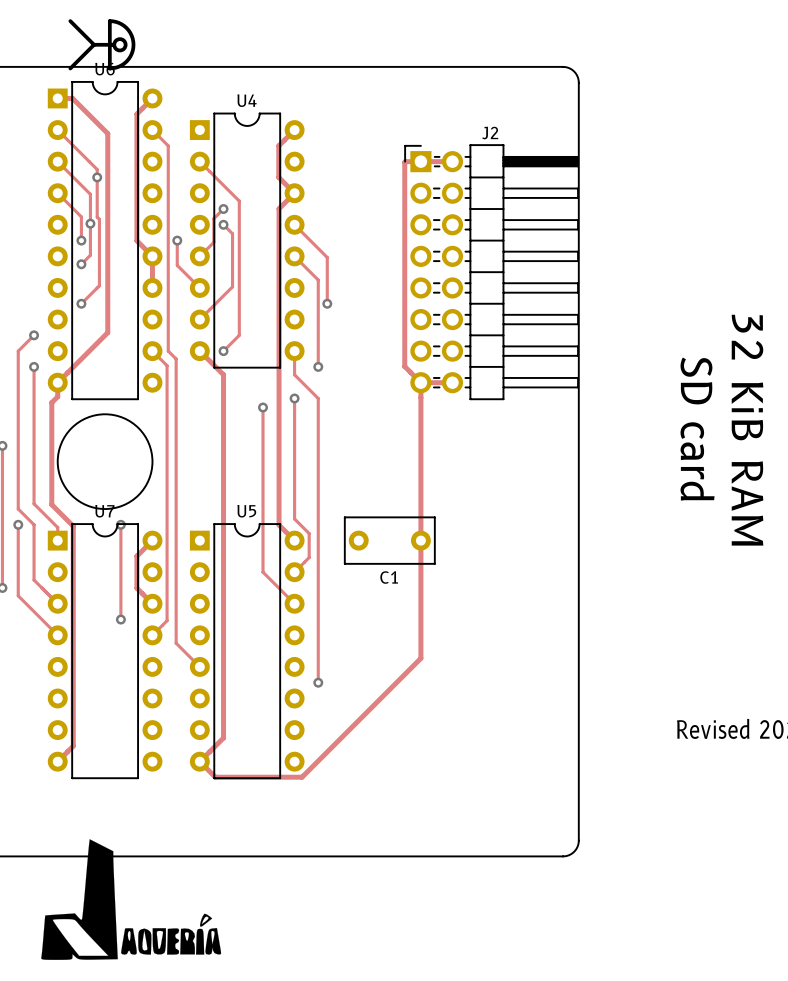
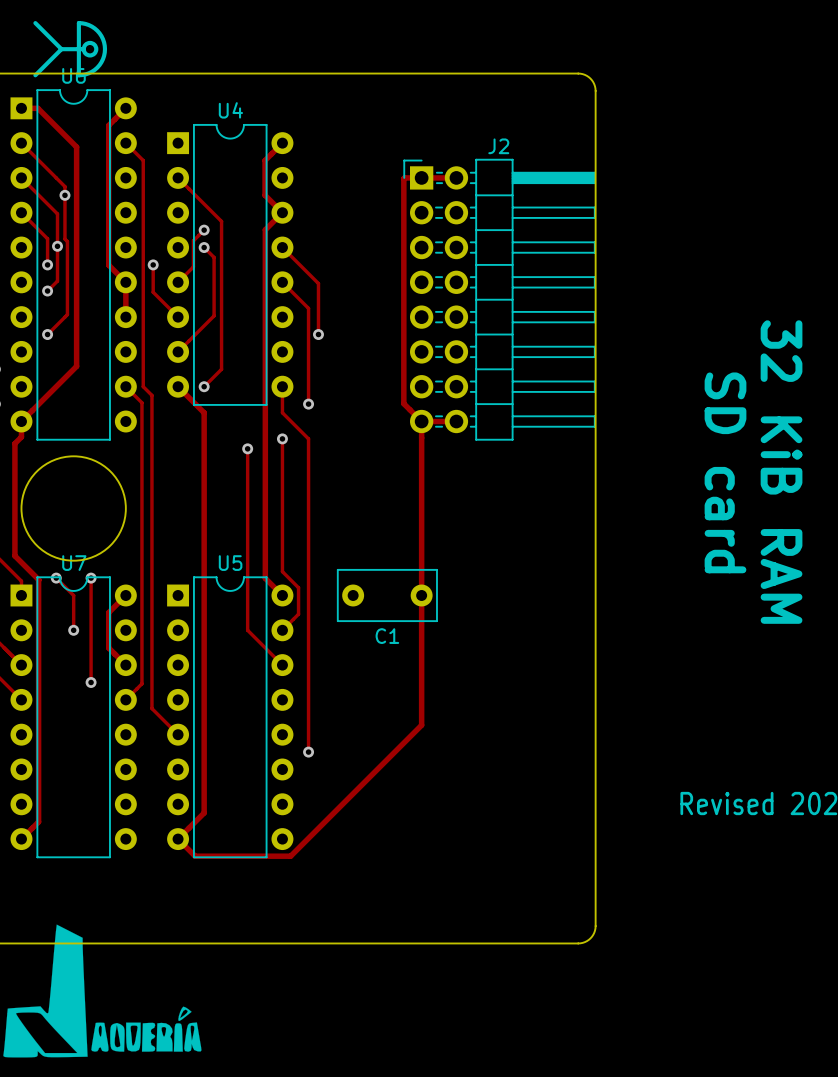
track: none -> (56, 578) (73, 595) (73, 630)
via: none -> (56, 578)
via: none -> (73, 630)

